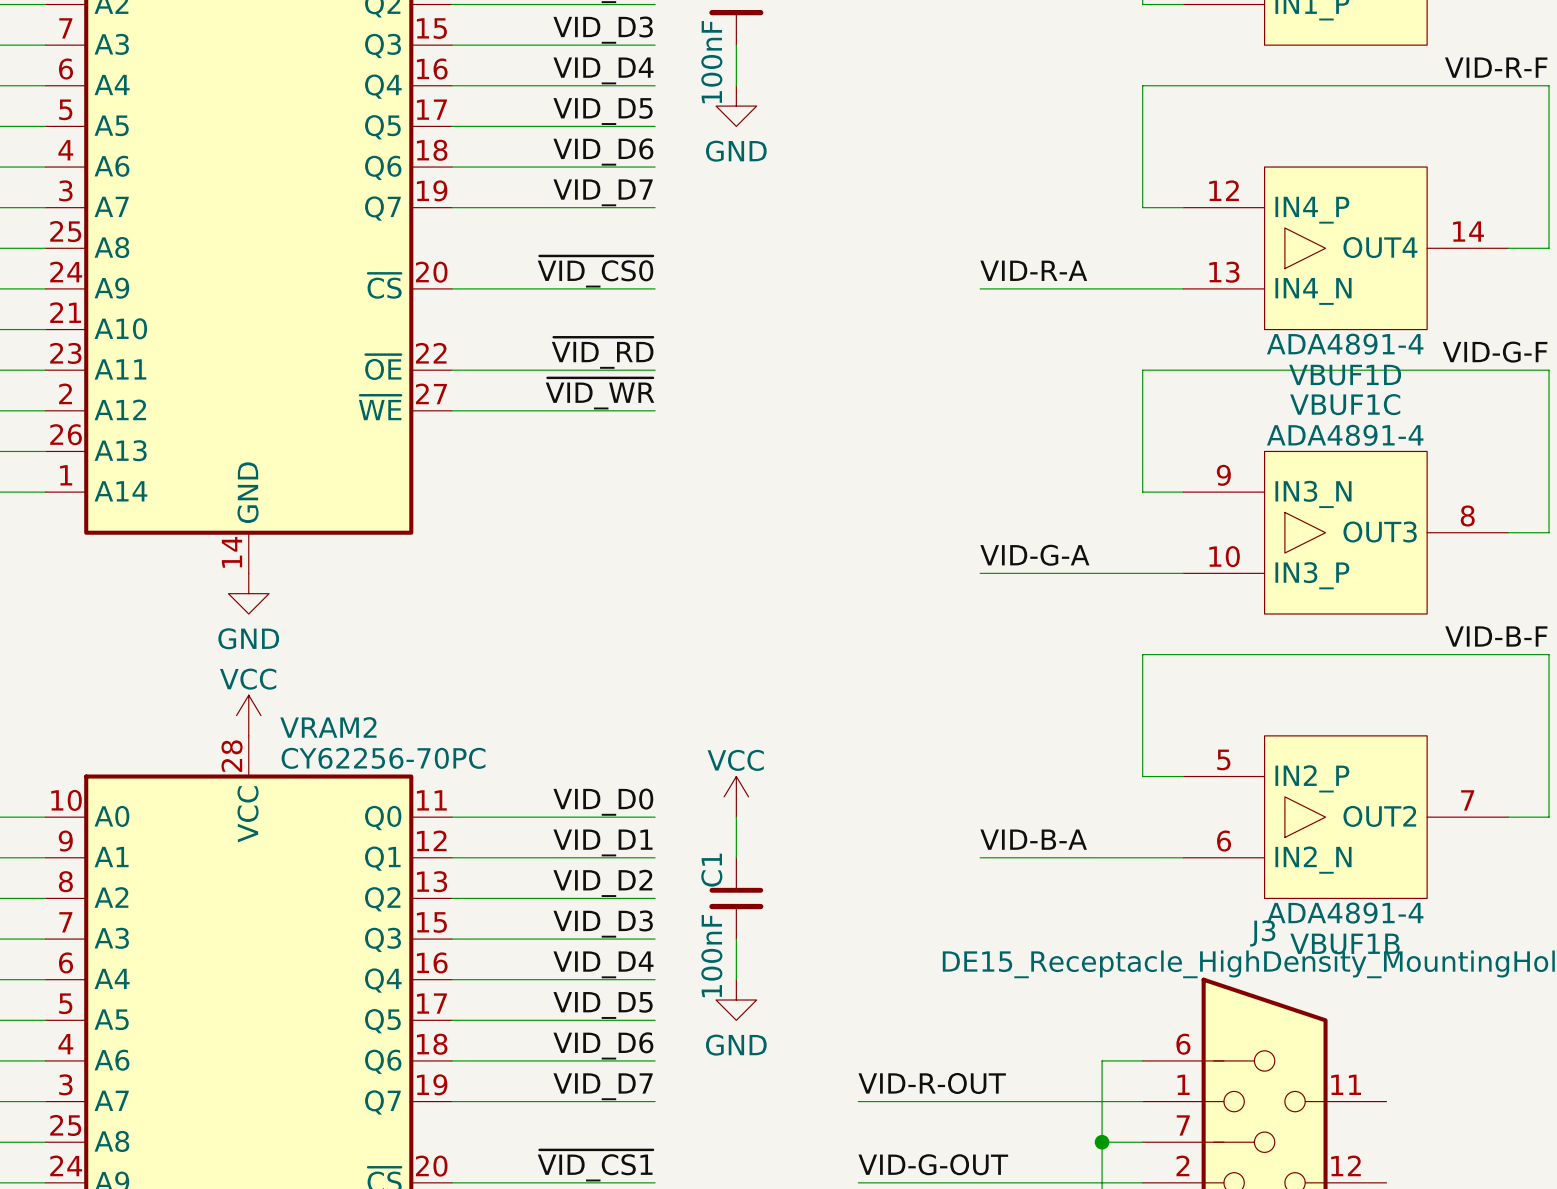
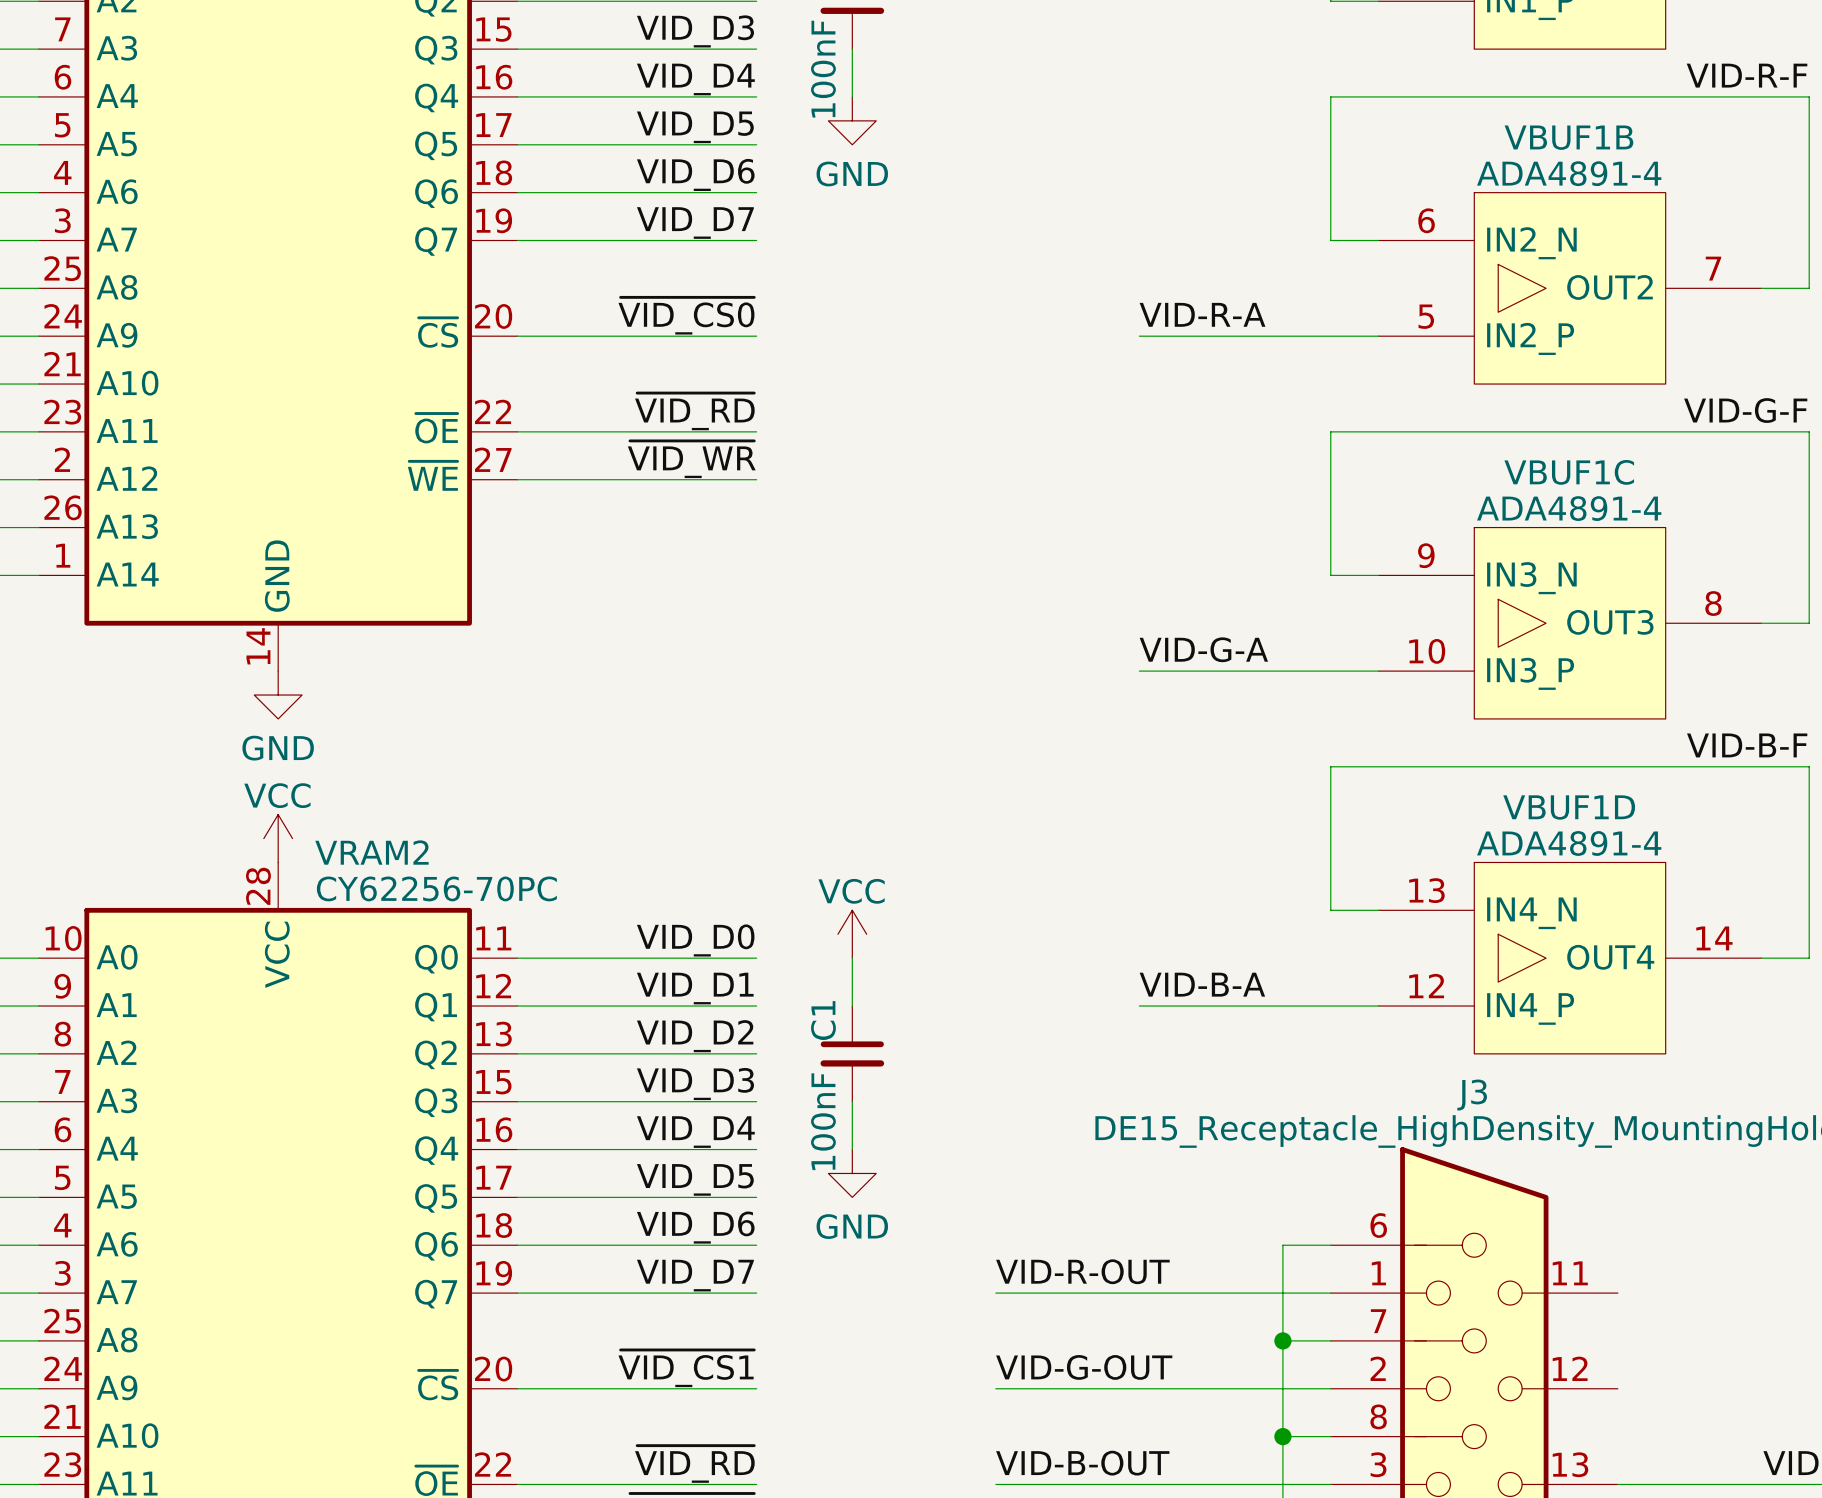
VBUF1D flip: as is (1345, 248) -> up-down (1569, 958)
VBUF1D position: (1345, 248) -> (1569, 958)
VBUF1B flip: as is (1345, 817) -> up-down (1569, 288)
VBUF1B position: (1345, 817) -> (1569, 288)

